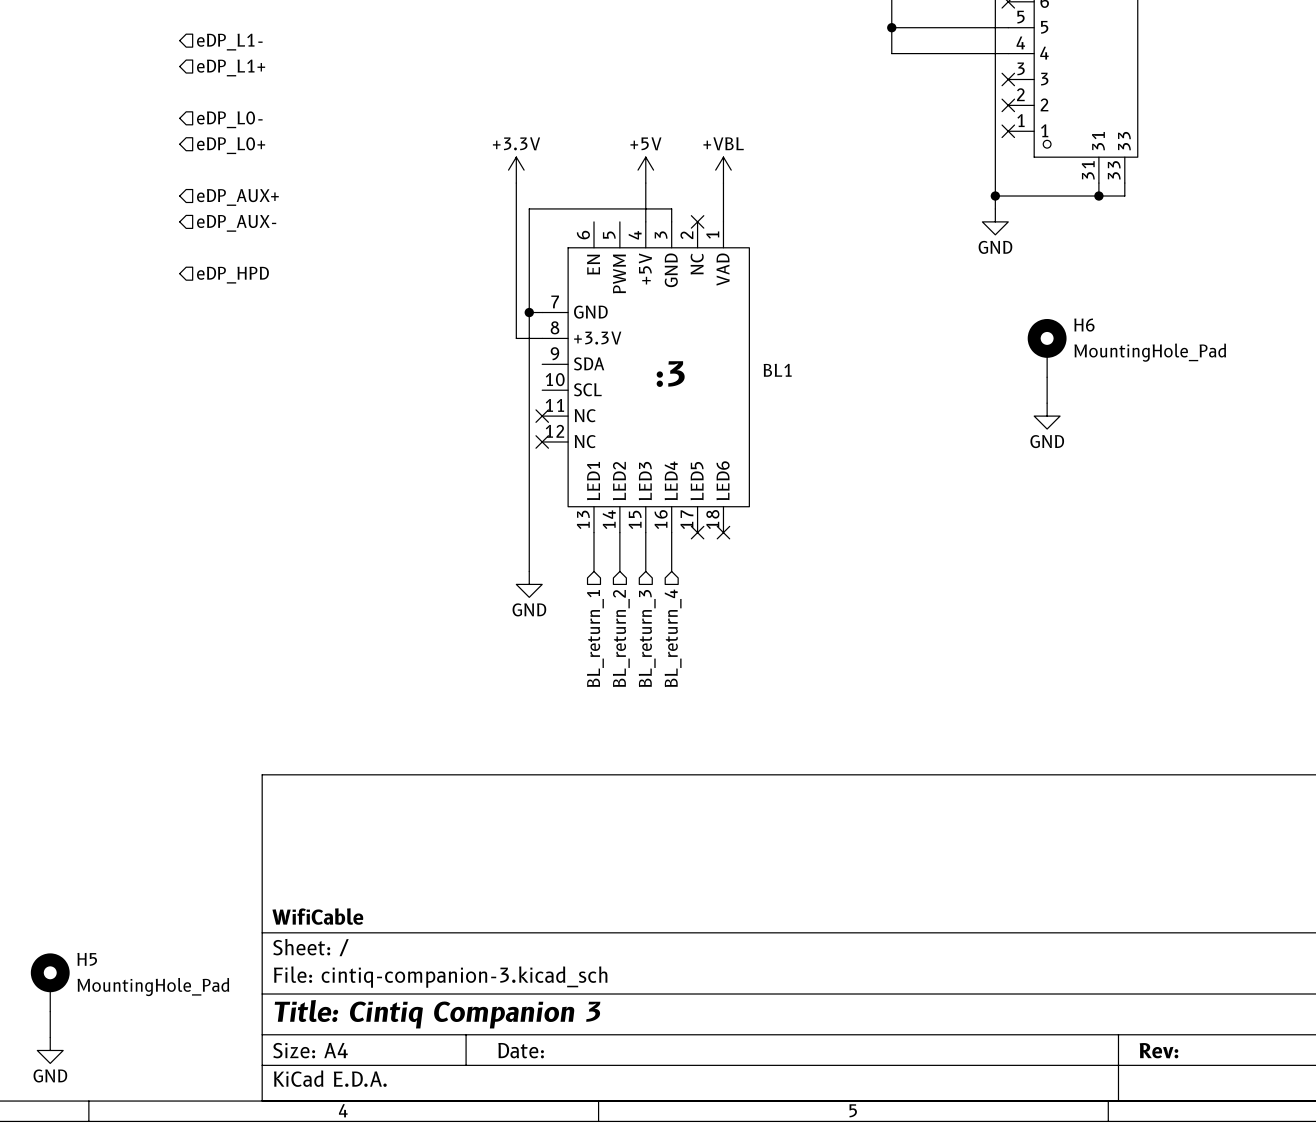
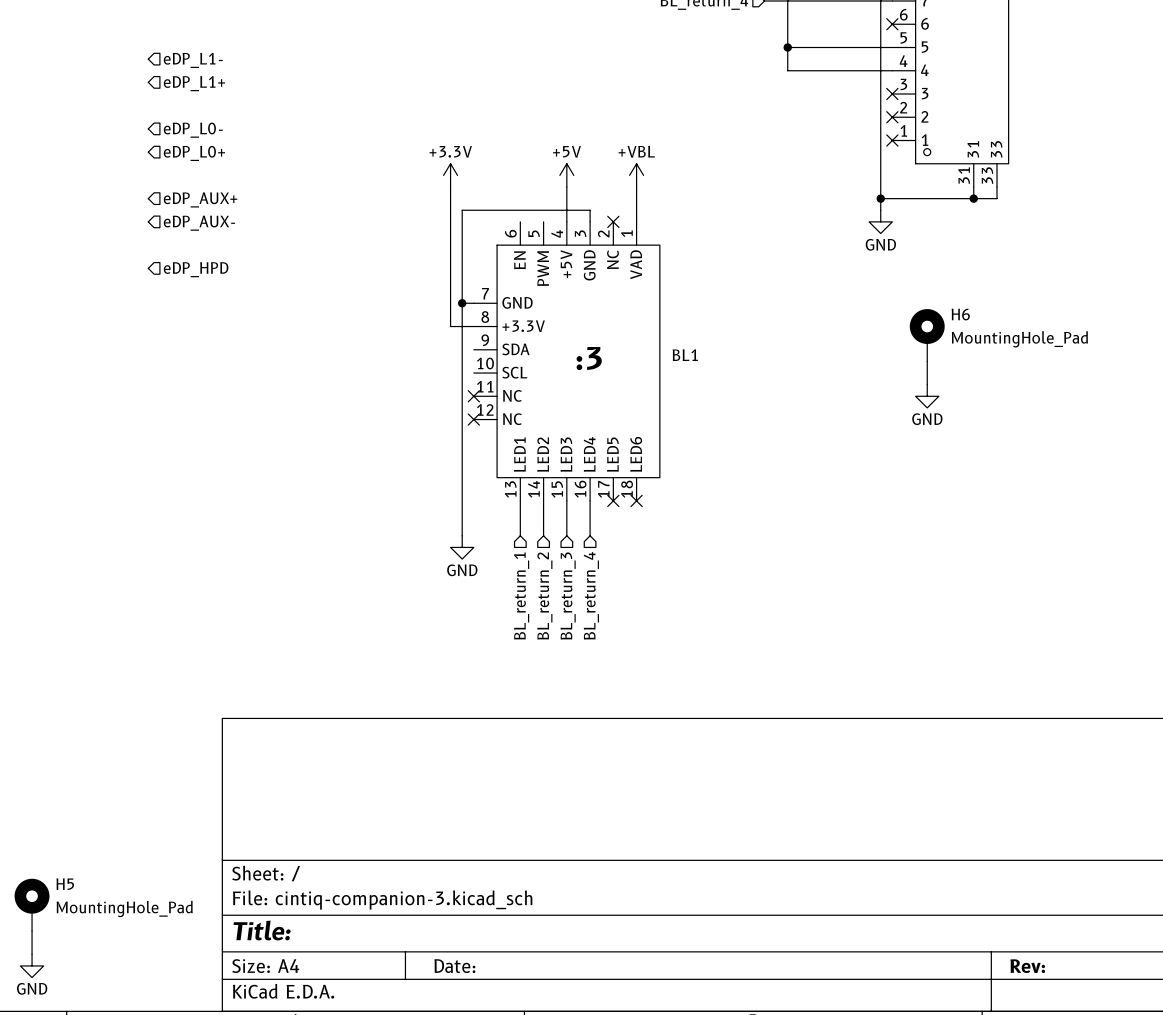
title block: WifiCable (317, 916) -> none
title block: Title: Cintiq Companion 3 (437, 1014) -> Title: (262, 930)

